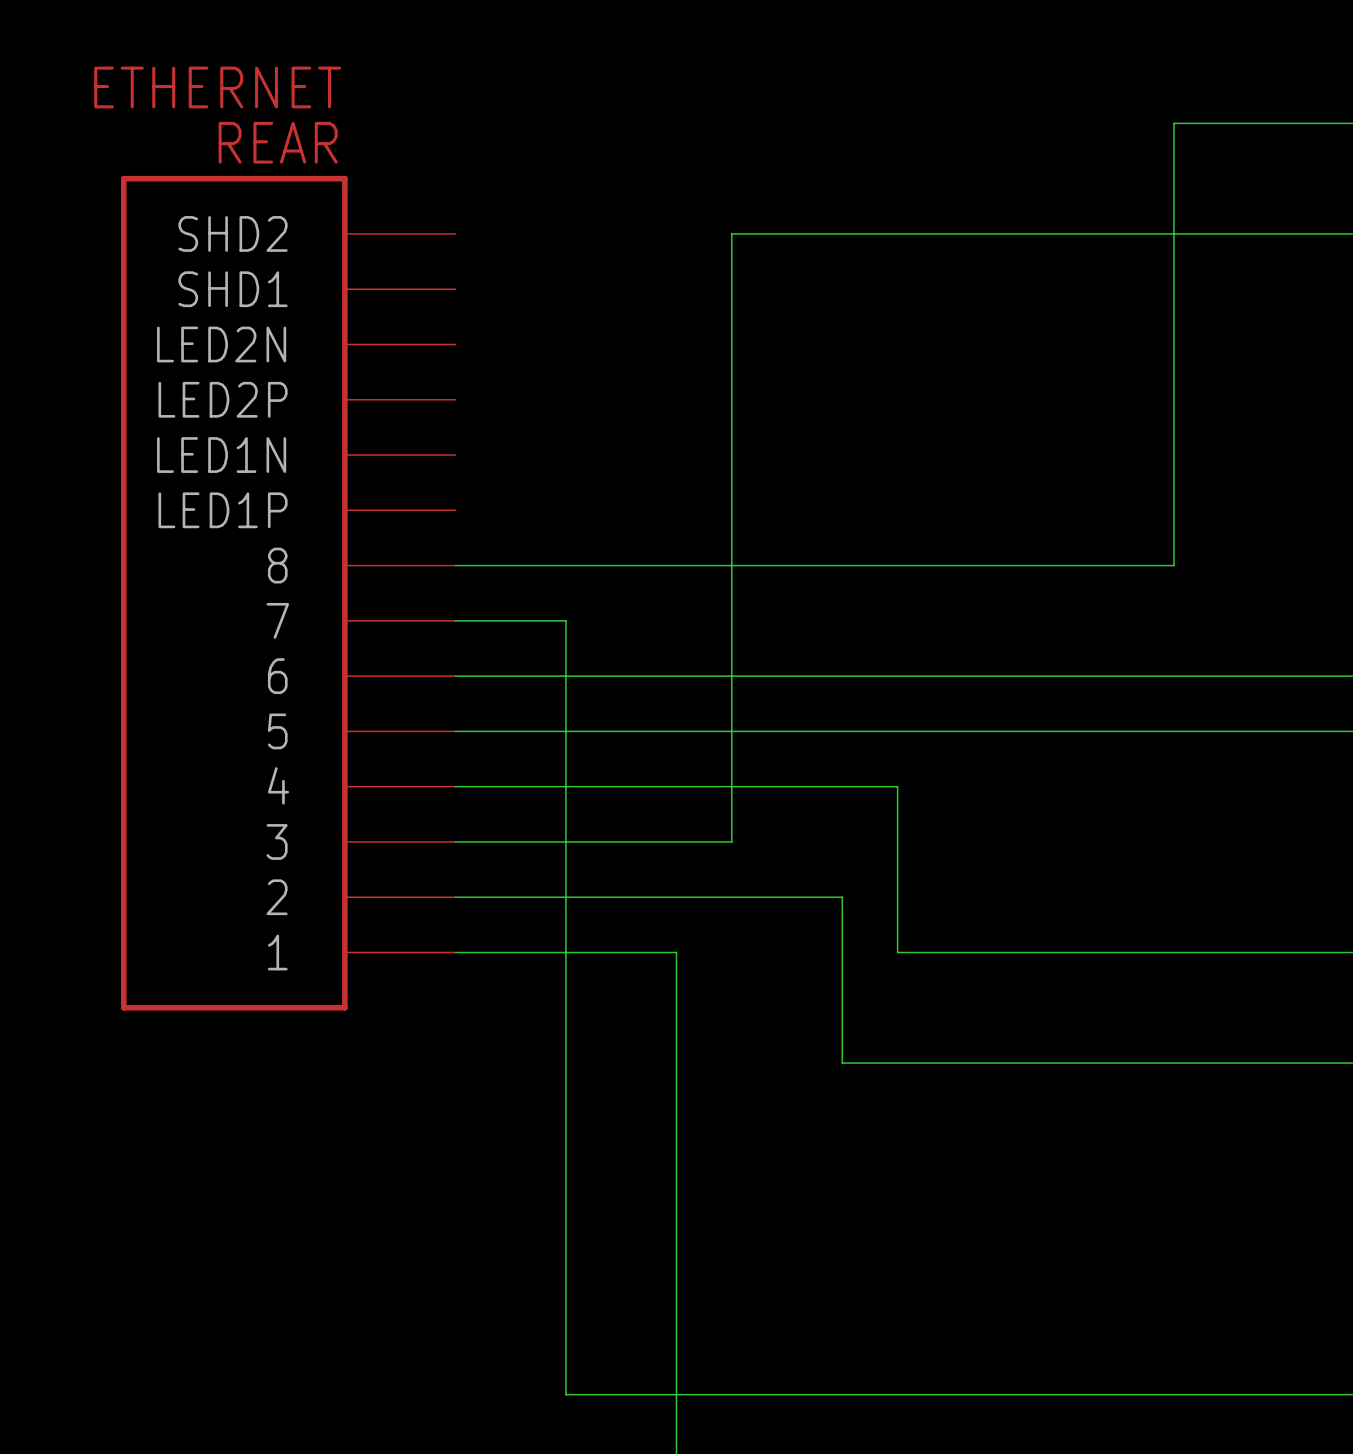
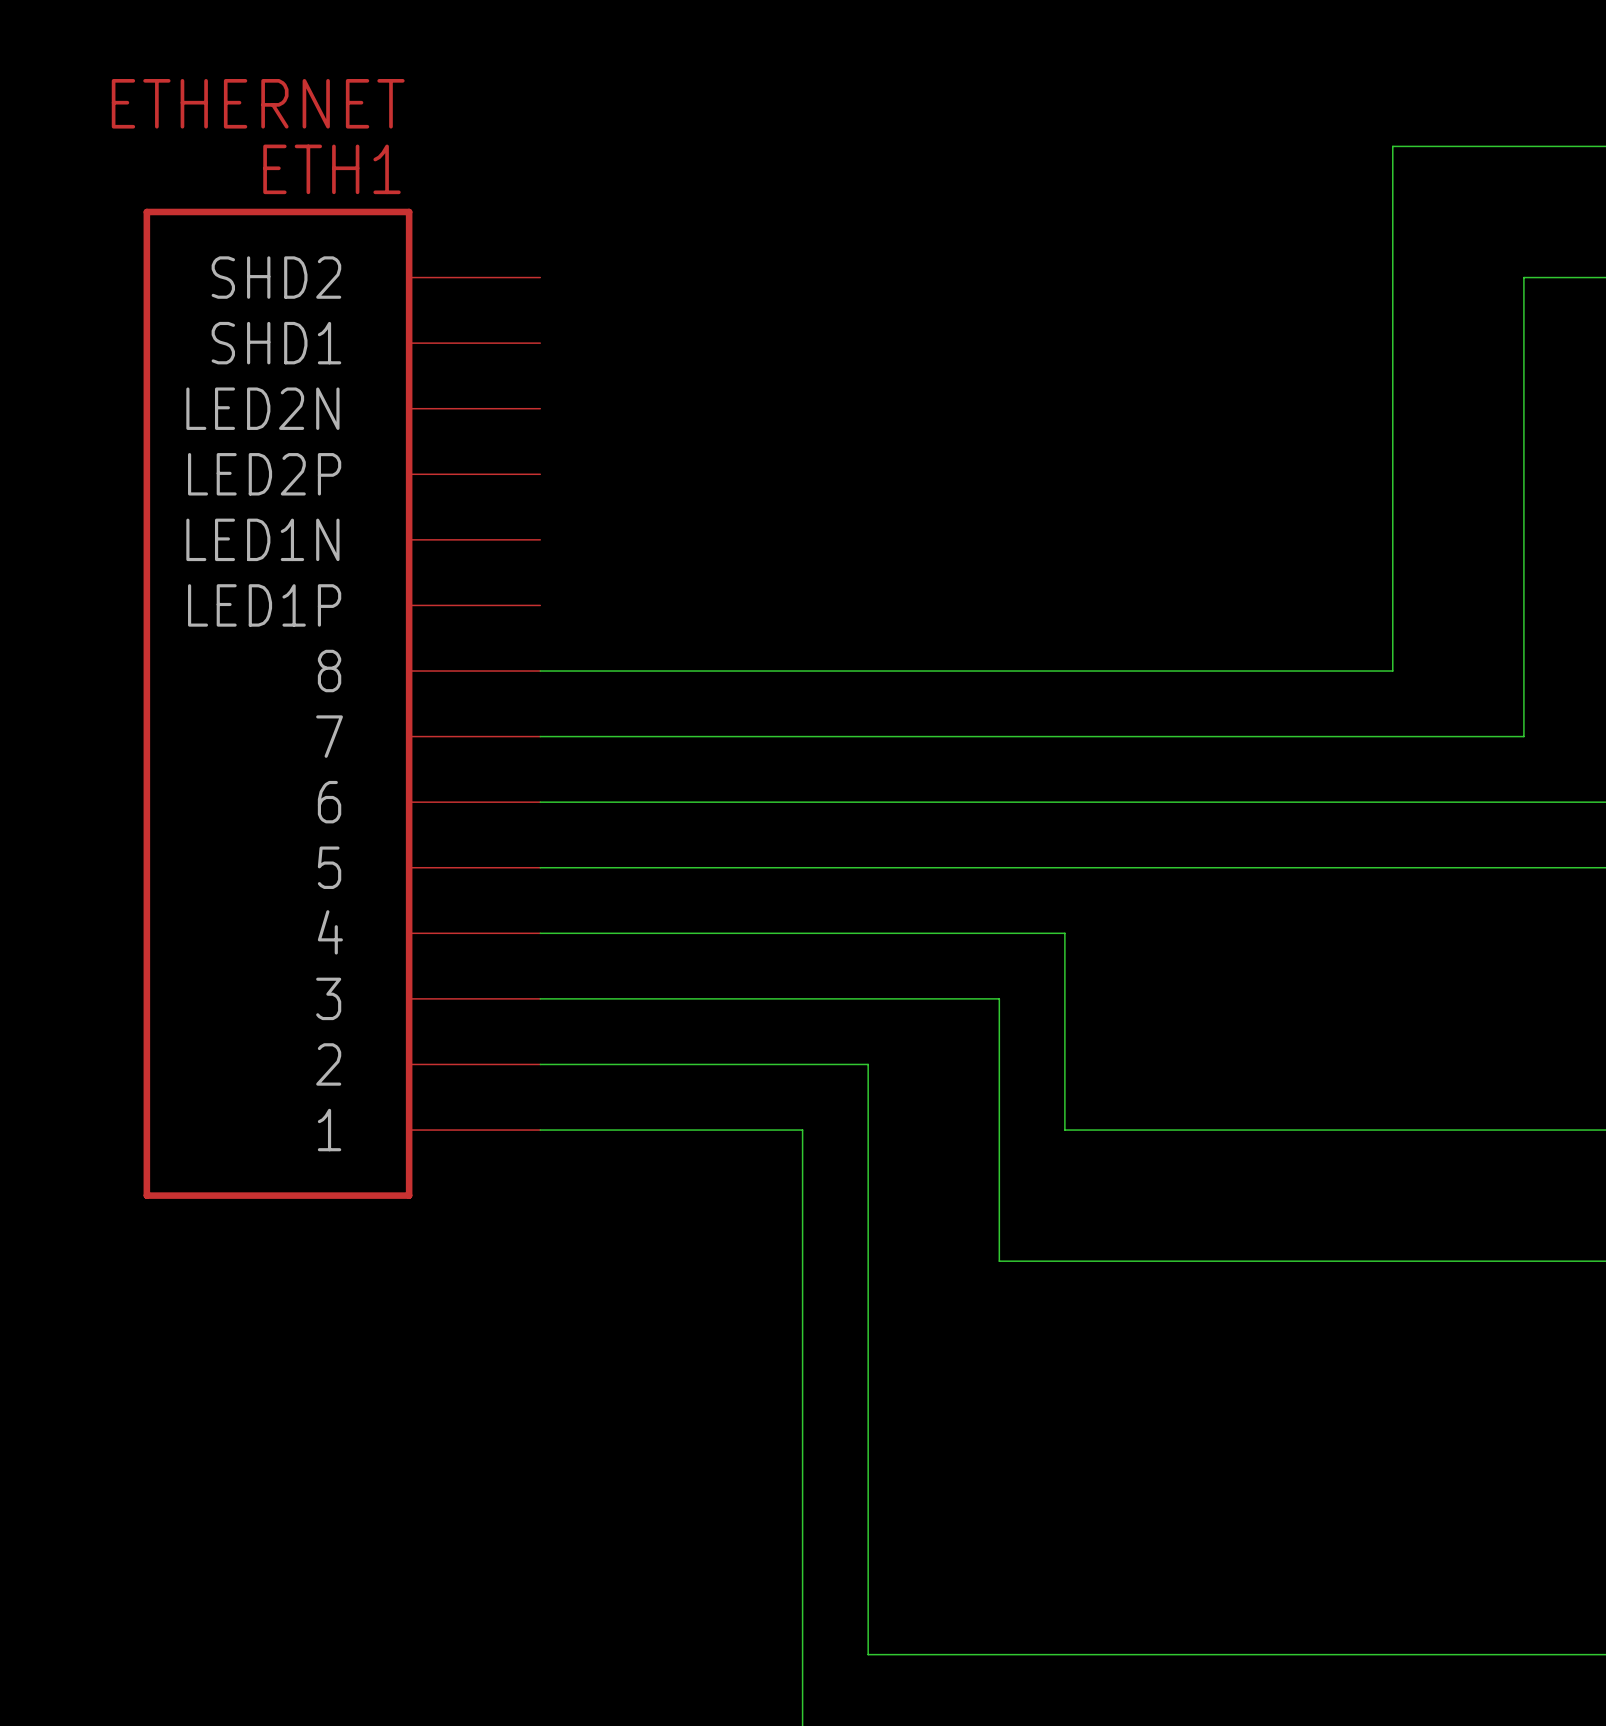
REAR name: REAR (278, 142) -> ETH1 (331, 169)
wire: (1284, 233) (731, 233) (731, 841) -> (1523, 277) (1523, 736) (671, 736)
wire: (565, 620) (565, 1394) (731, 1394) -> (868, 1064) (868, 1654)
wire: (731, 897) (842, 897) -> (868, 998) (999, 998) (999, 1064)

